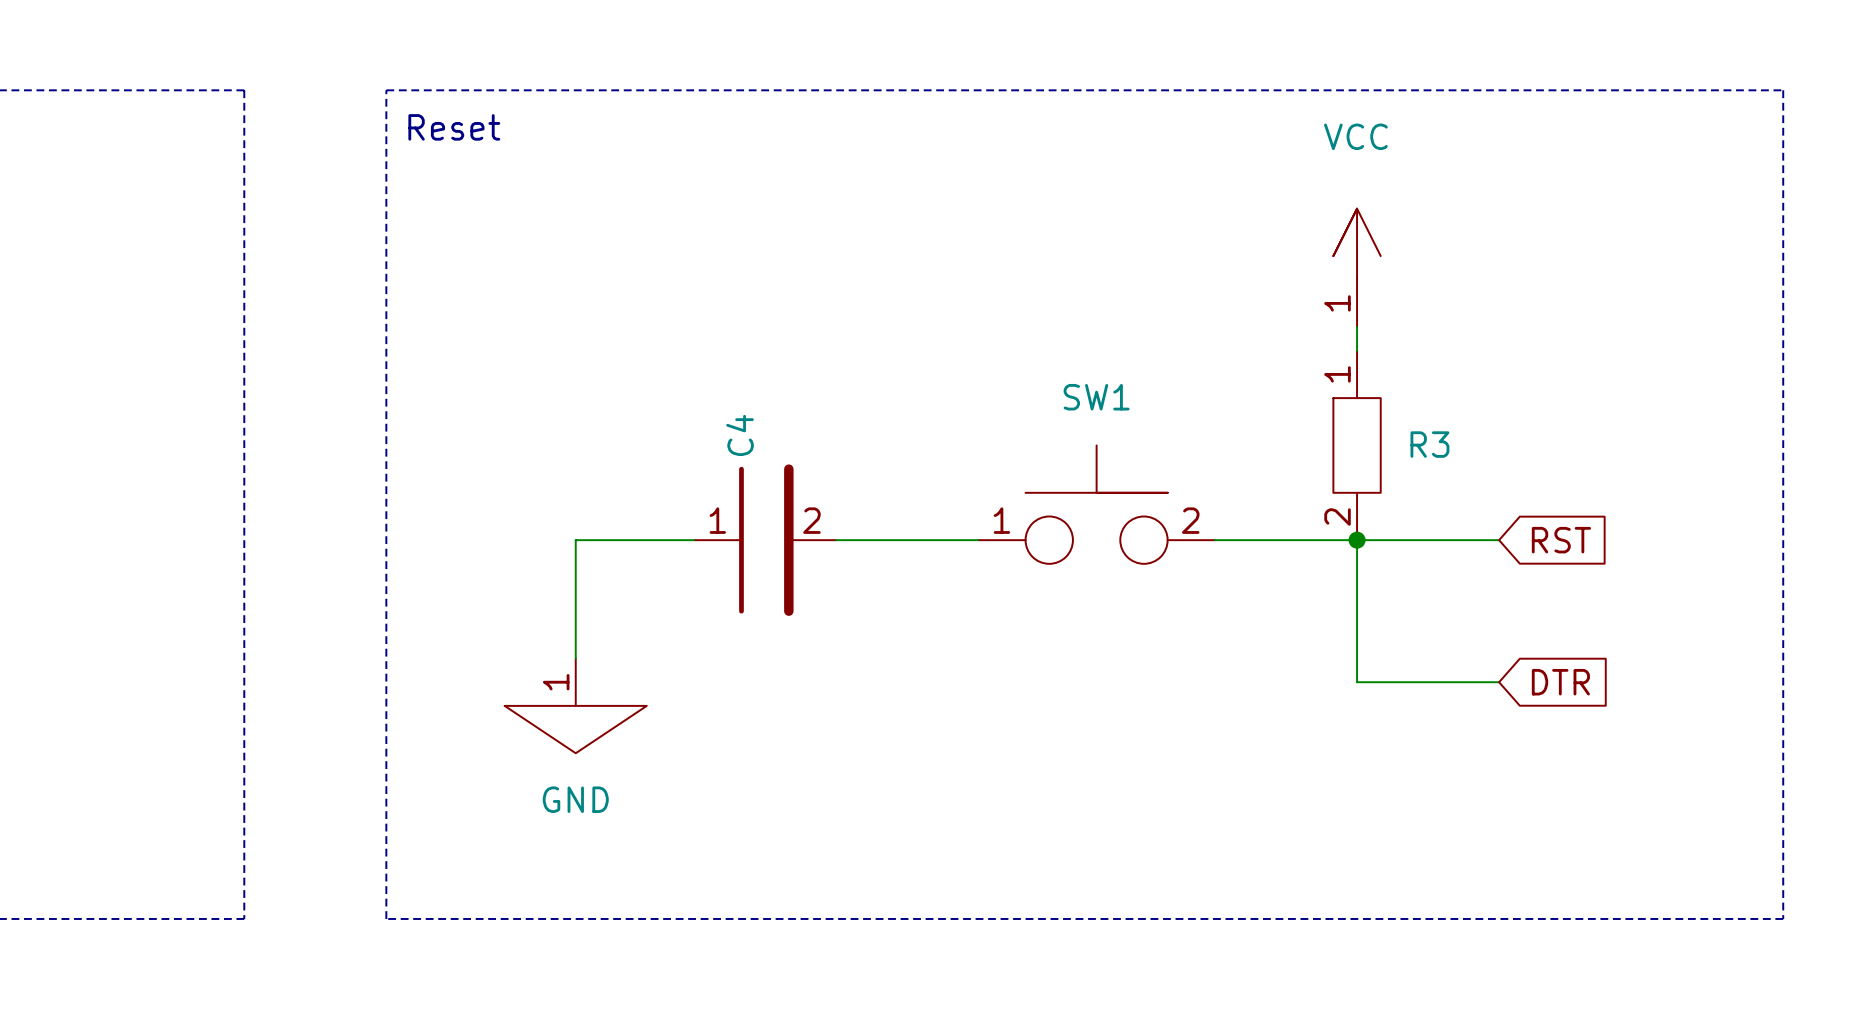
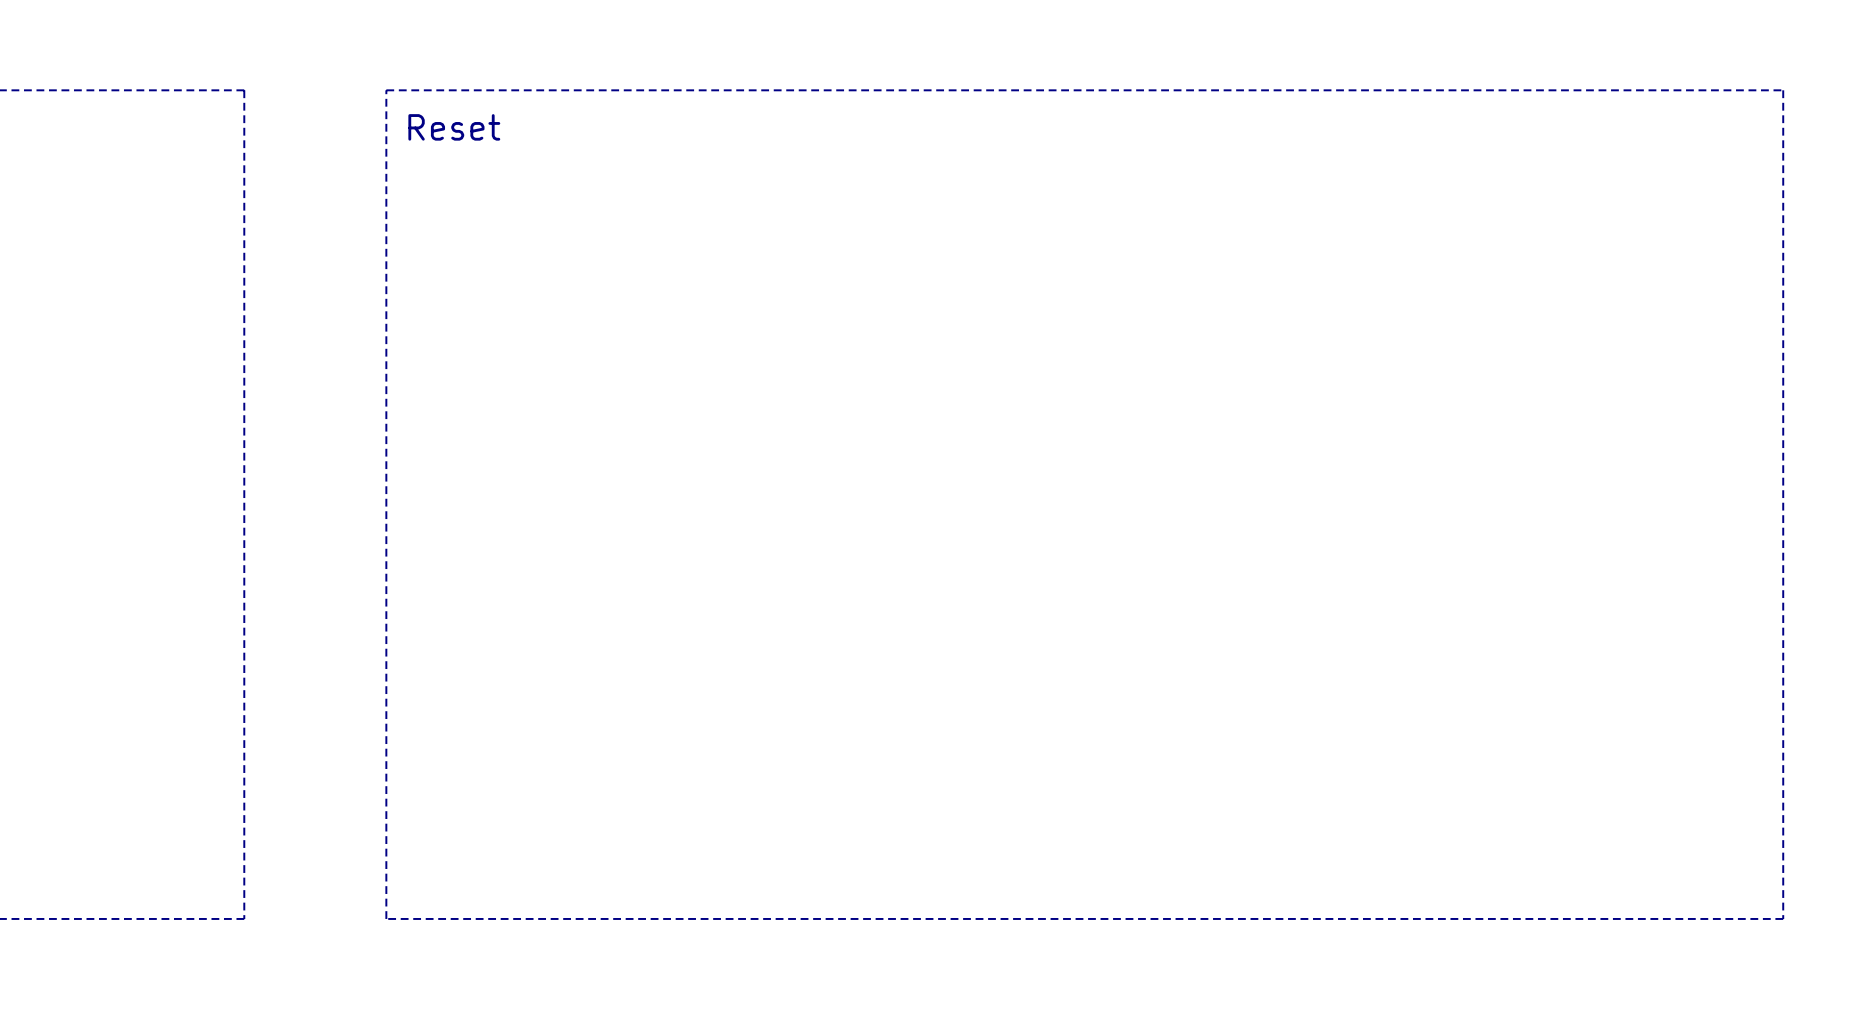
power symbol: VCC (1357, 256) -> none
wire: (1357, 327) (1357, 350) -> none
R3: (1357, 445) -> none
SW1: (1096, 504) -> none
wire: (694, 540) (575, 540) (575, 658) -> none
C4: (765, 540) -> none
wire: (836, 540) (978, 540) -> none
wire: (1215, 540) (1499, 540) -> none
wire: (1357, 540) (1357, 682) (1499, 682) -> none
junction: (1357, 540) -> none
global label: RST (1561, 540) -> none
global label: DTR (1560, 682) -> none
power symbol: GND (575, 705) -> none

